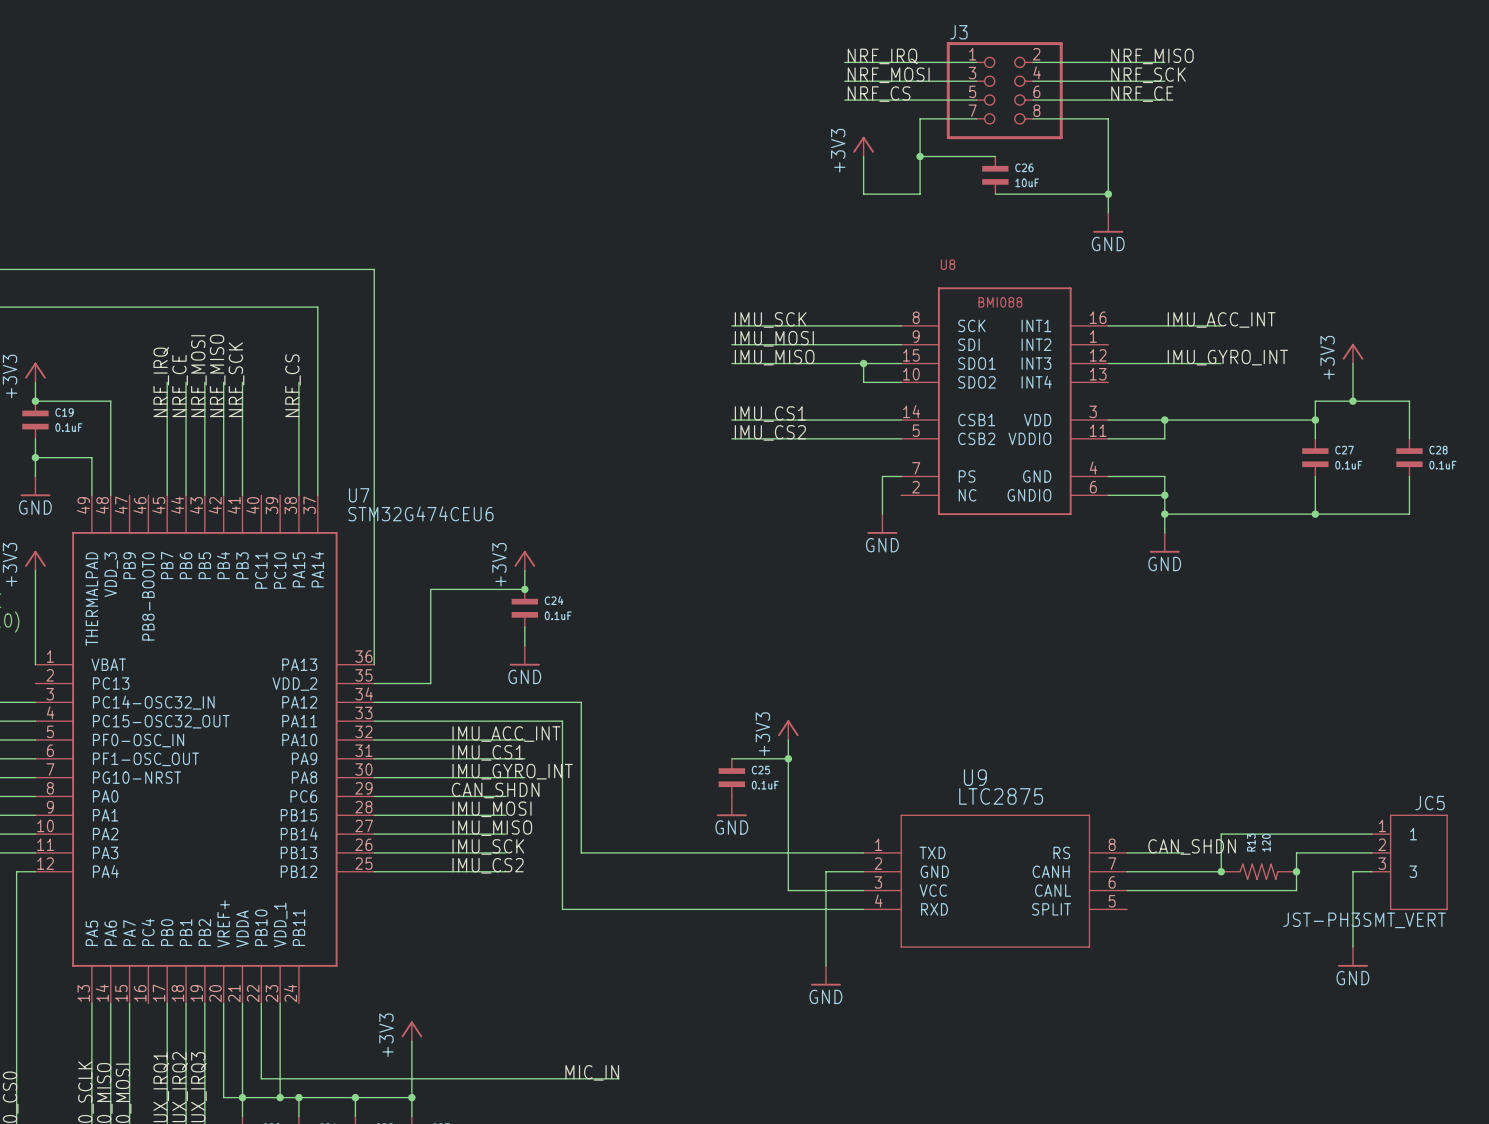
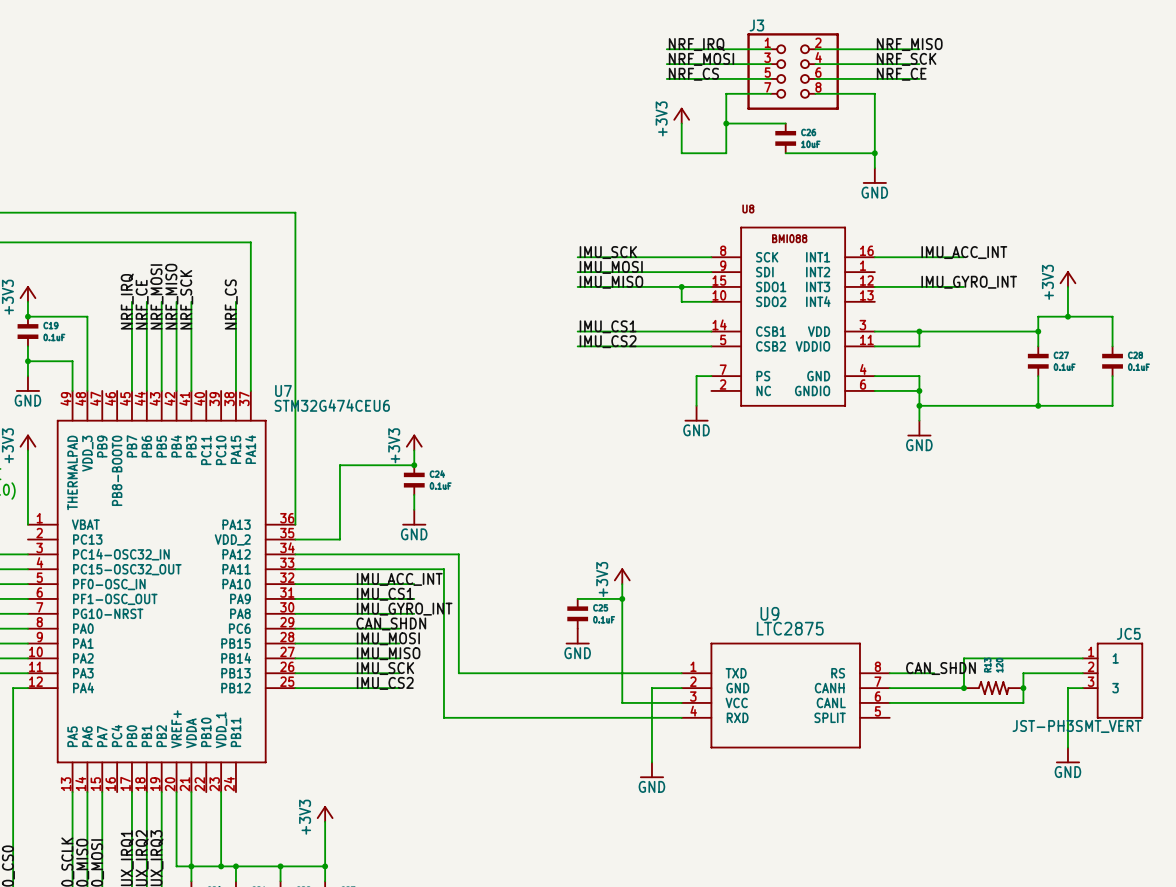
wire: (261, 1003) (261, 1078) (618, 1078) -> none
label: MIC_IN (592, 1072) -> none

